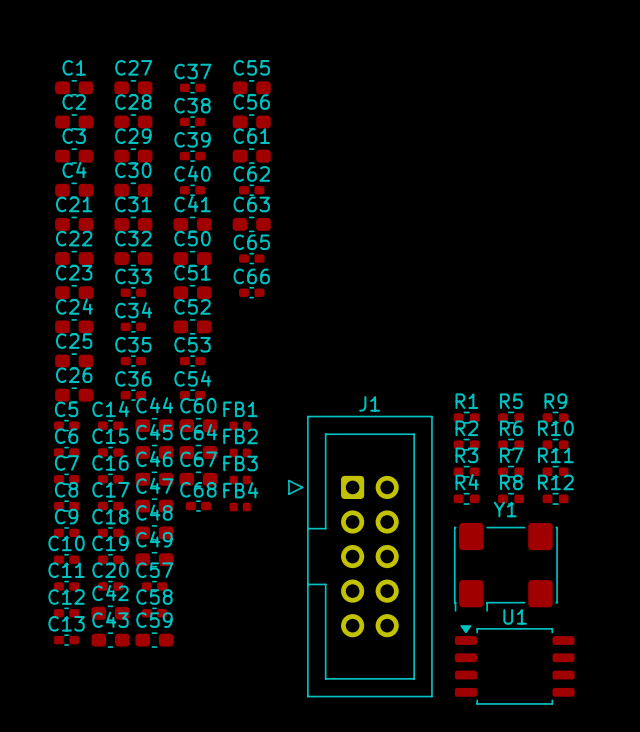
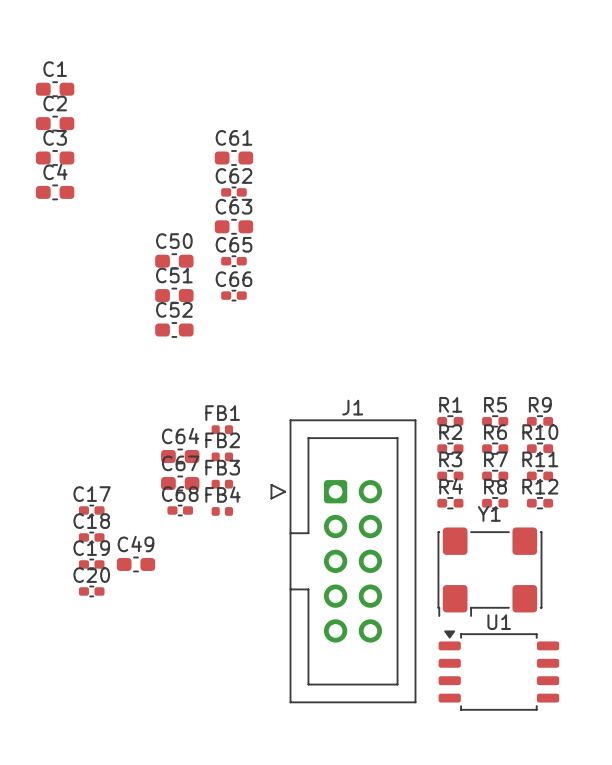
C27: (133, 87) -> none
C37: (192, 87) -> none
C55: (251, 87) -> none
C28: (133, 121) -> none
C38: (192, 121) -> none
C56: (251, 121) -> none
C29: (133, 156) -> none
C39: (192, 156) -> none
C30: (133, 190) -> none
C40: (192, 190) -> none
C21: (74, 224) -> none
C31: (133, 224) -> none
C41: (192, 224) -> none
C22: (74, 258) -> none
C32: (133, 258) -> none
C23: (74, 292) -> none
C33: (133, 292) -> none
C24: (74, 326) -> none
C34: (133, 326) -> none
C25: (74, 361) -> none
C35: (133, 361) -> none
C53: (192, 361) -> none
C26: (74, 395) -> none
C36: (133, 395) -> none
C54: (192, 395) -> none
C5: (66, 425) -> none
C14: (110, 425) -> none
C44: (154, 425) -> none
C60: (198, 425) -> none
C6: (66, 452) -> none
C15: (110, 452) -> none
C45: (154, 452) -> none
C7: (66, 479) -> none
C16: (110, 479) -> none
C46: (154, 479) -> none
C8: (66, 506) -> none
C47: (154, 506) -> none
C9: (66, 532) -> none
C48: (154, 532) -> none
C10: (66, 559) -> none
C11: (66, 586) -> none
C57: (154, 586) -> none
C12: (66, 613) -> none
C42: (110, 613) -> none
C58: (154, 613) -> none
C13: (66, 640) -> none
C43: (110, 640) -> none
C59: (154, 640) -> none

